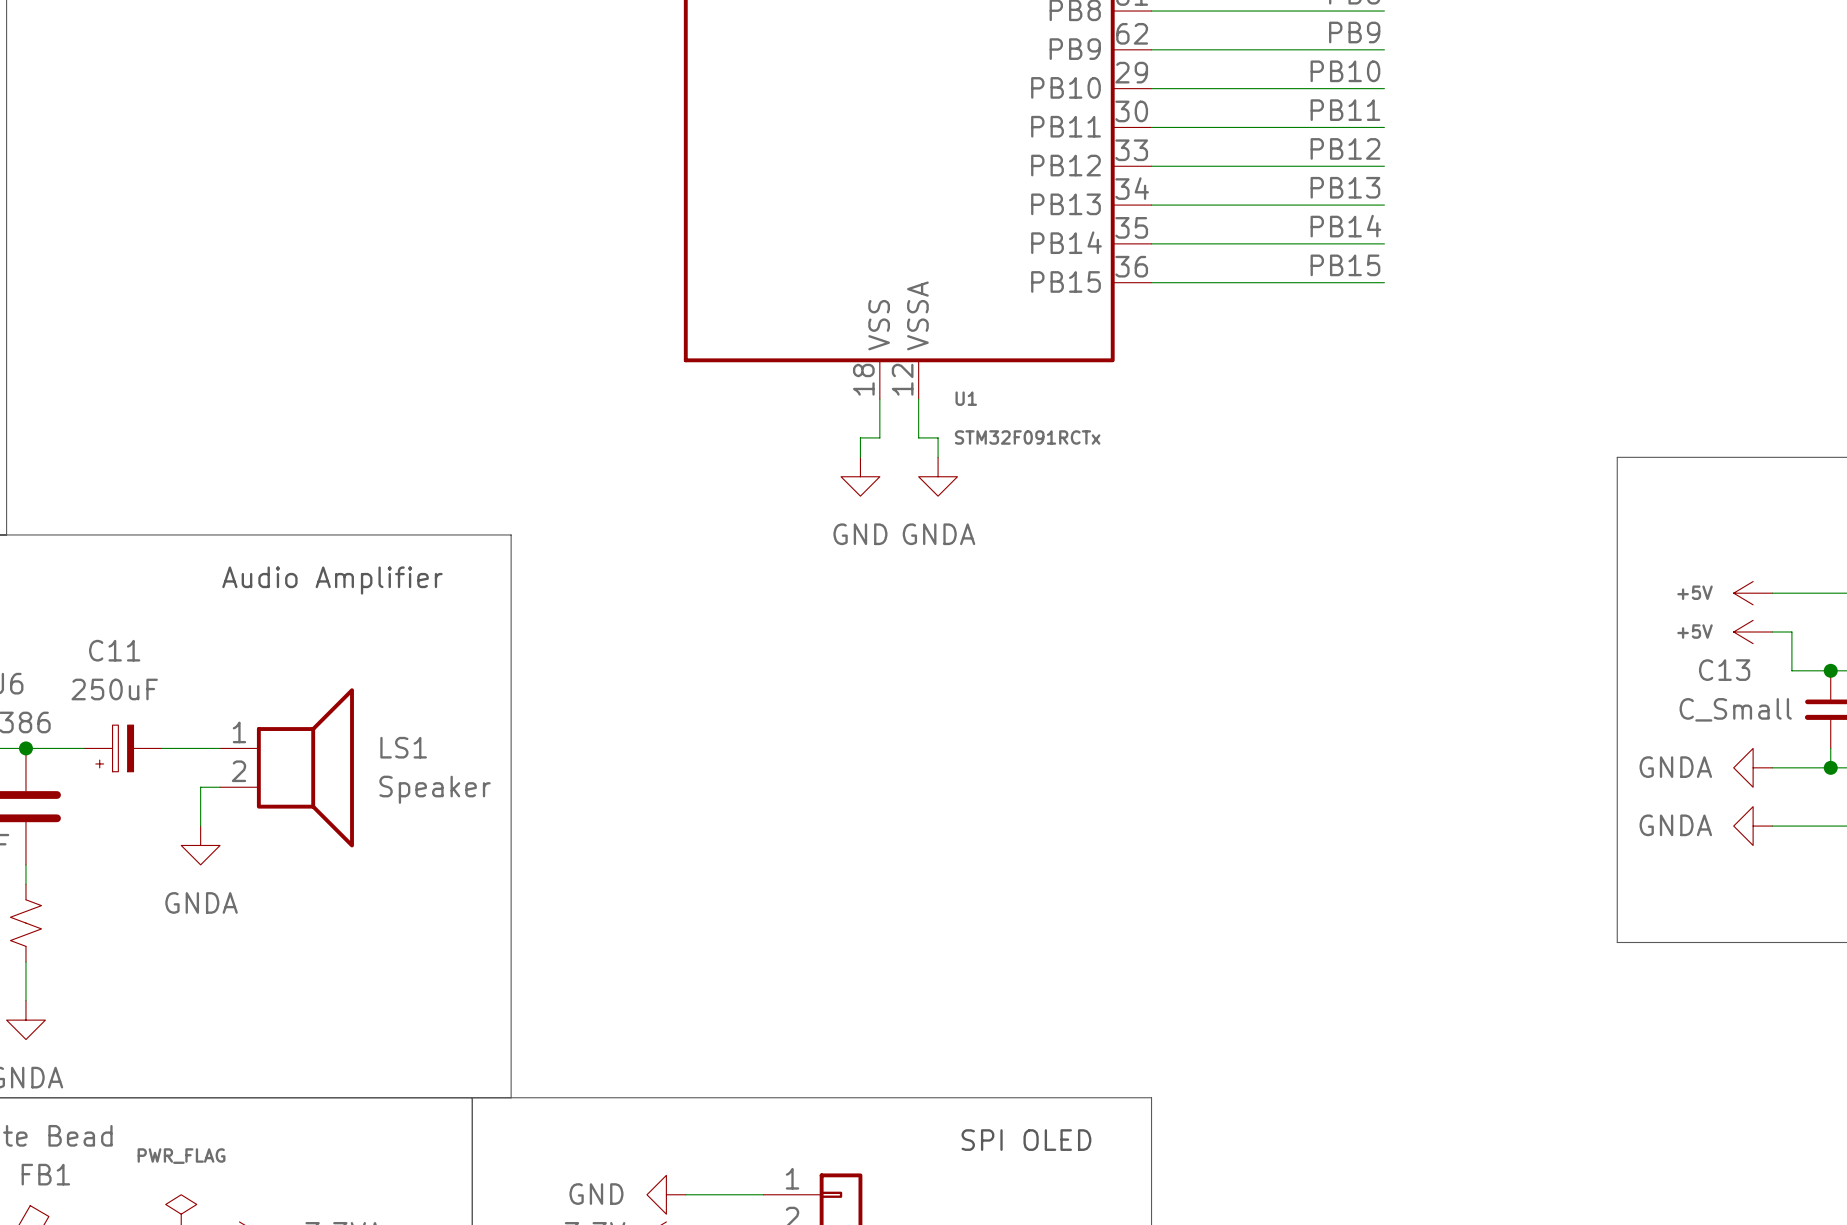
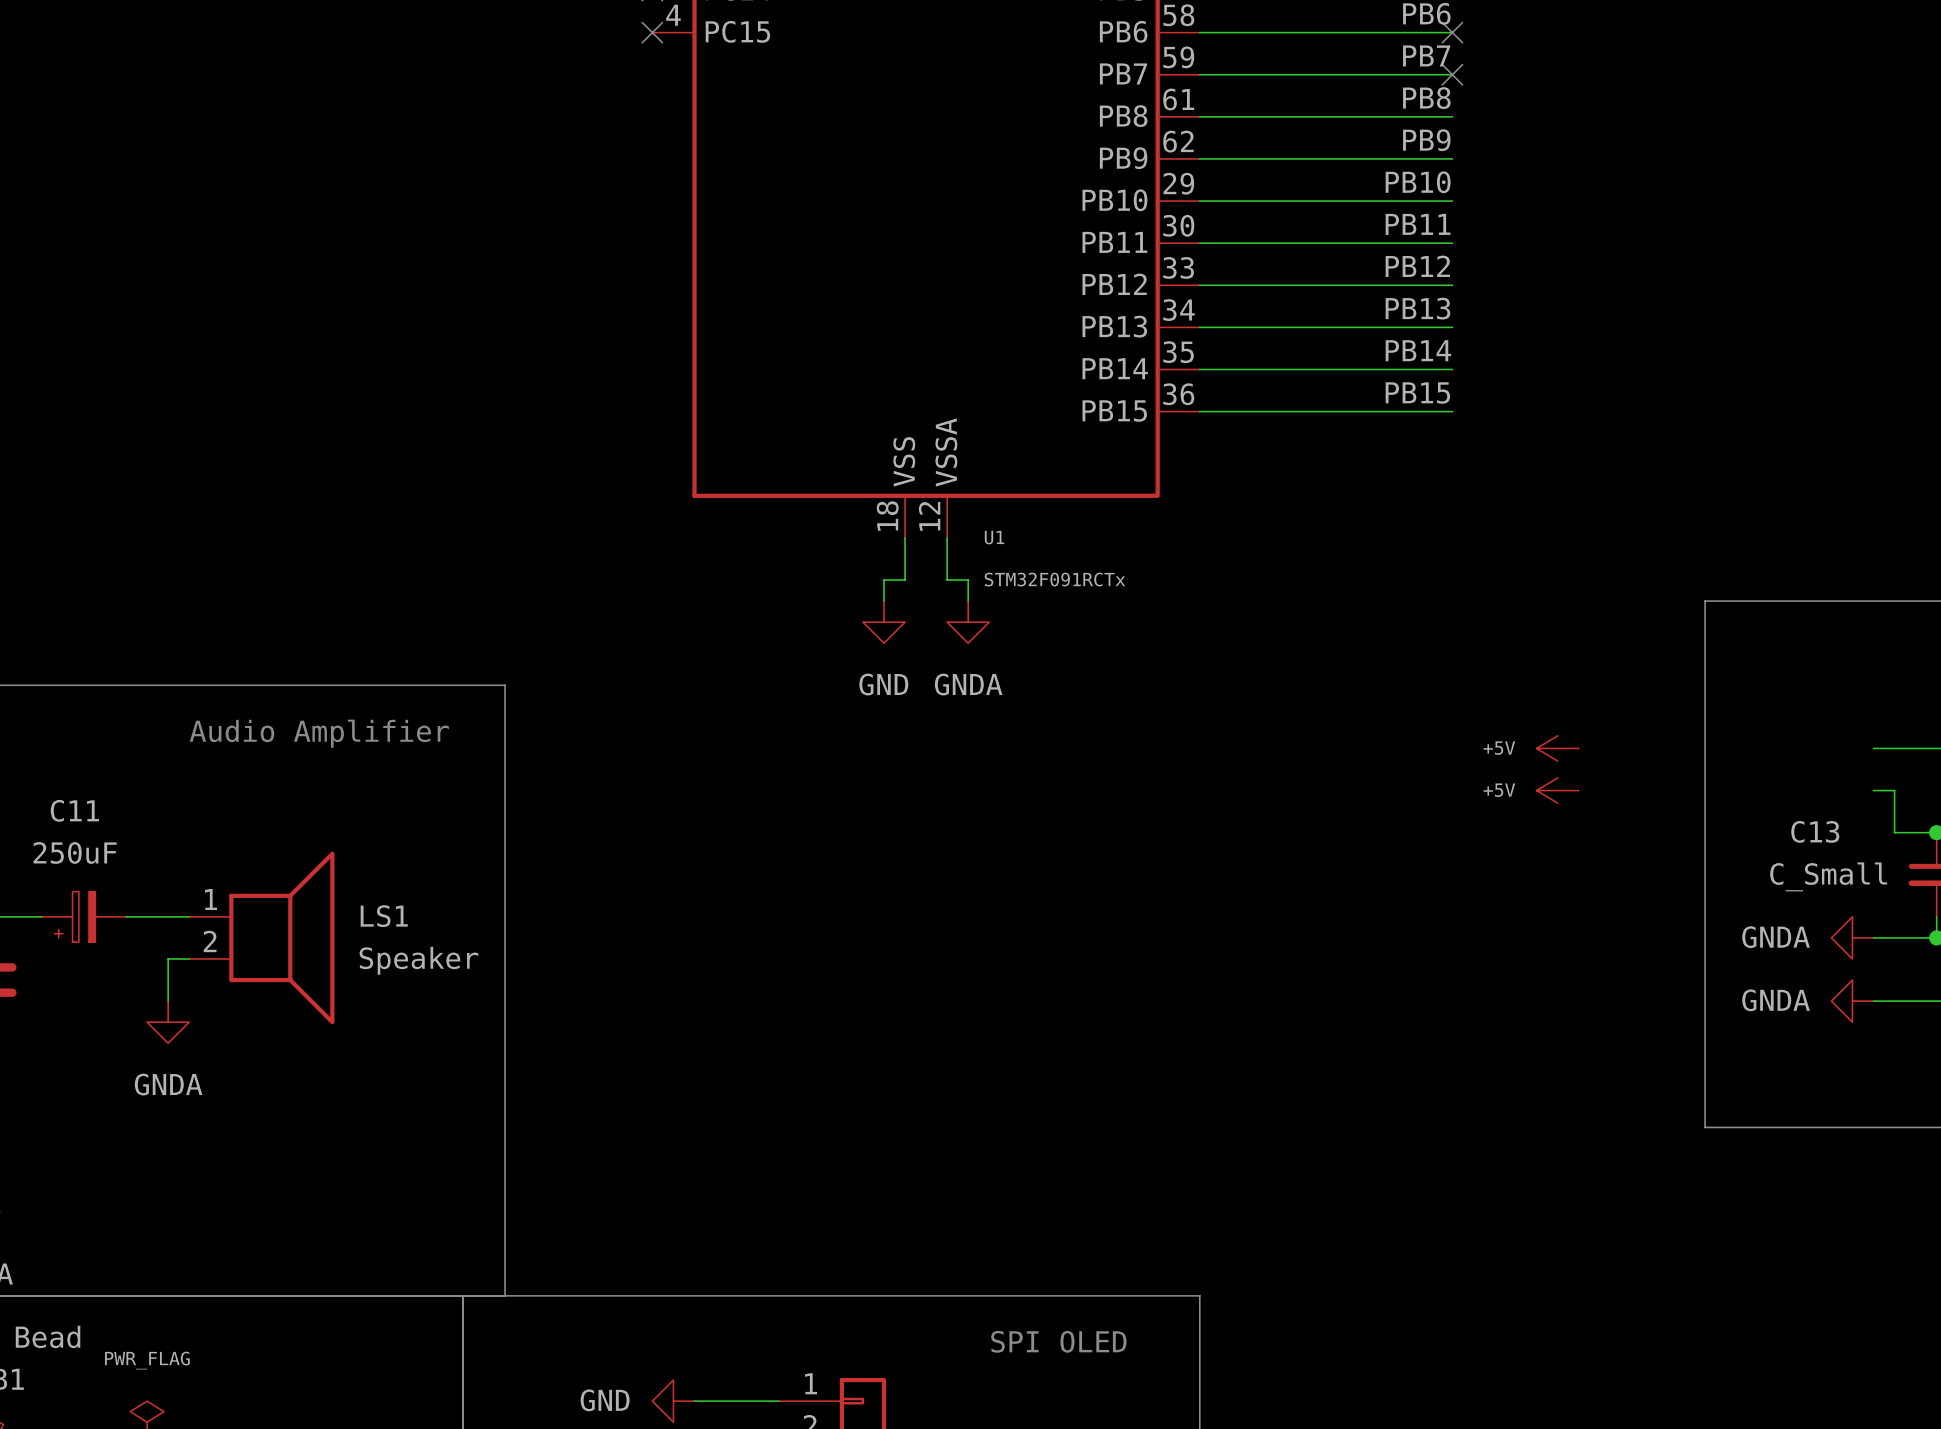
power symbol: none -> +5V (1557, 748)
power symbol: +5V (1753, 593) -> none
power symbol: none -> +5V (1557, 790)
power symbol: +5V (1753, 632) -> none

